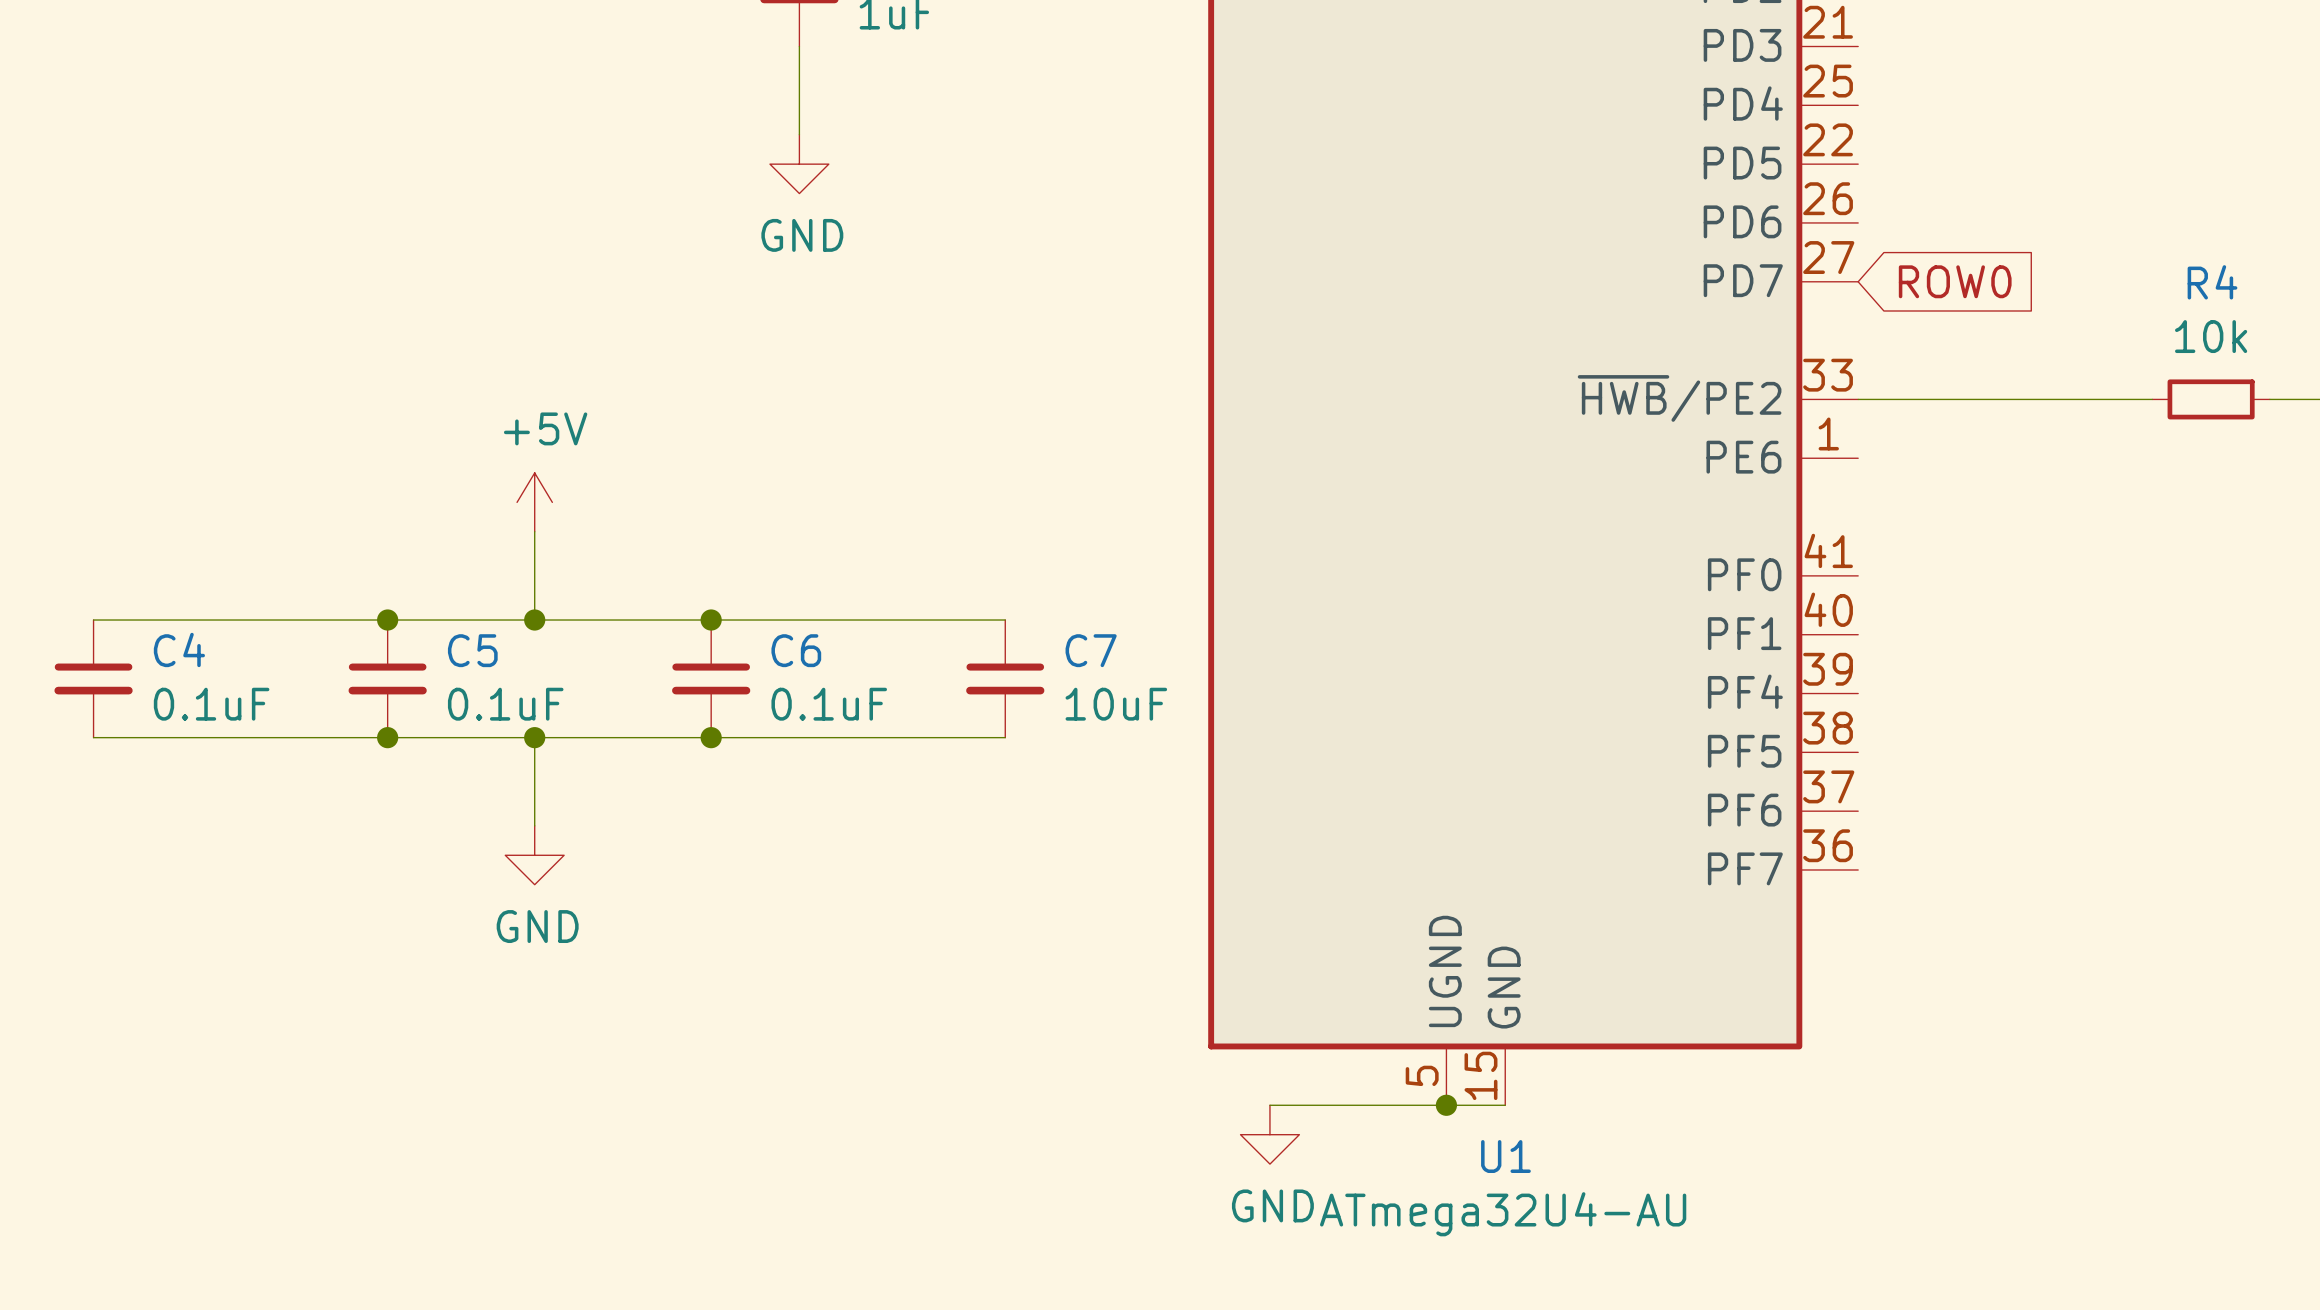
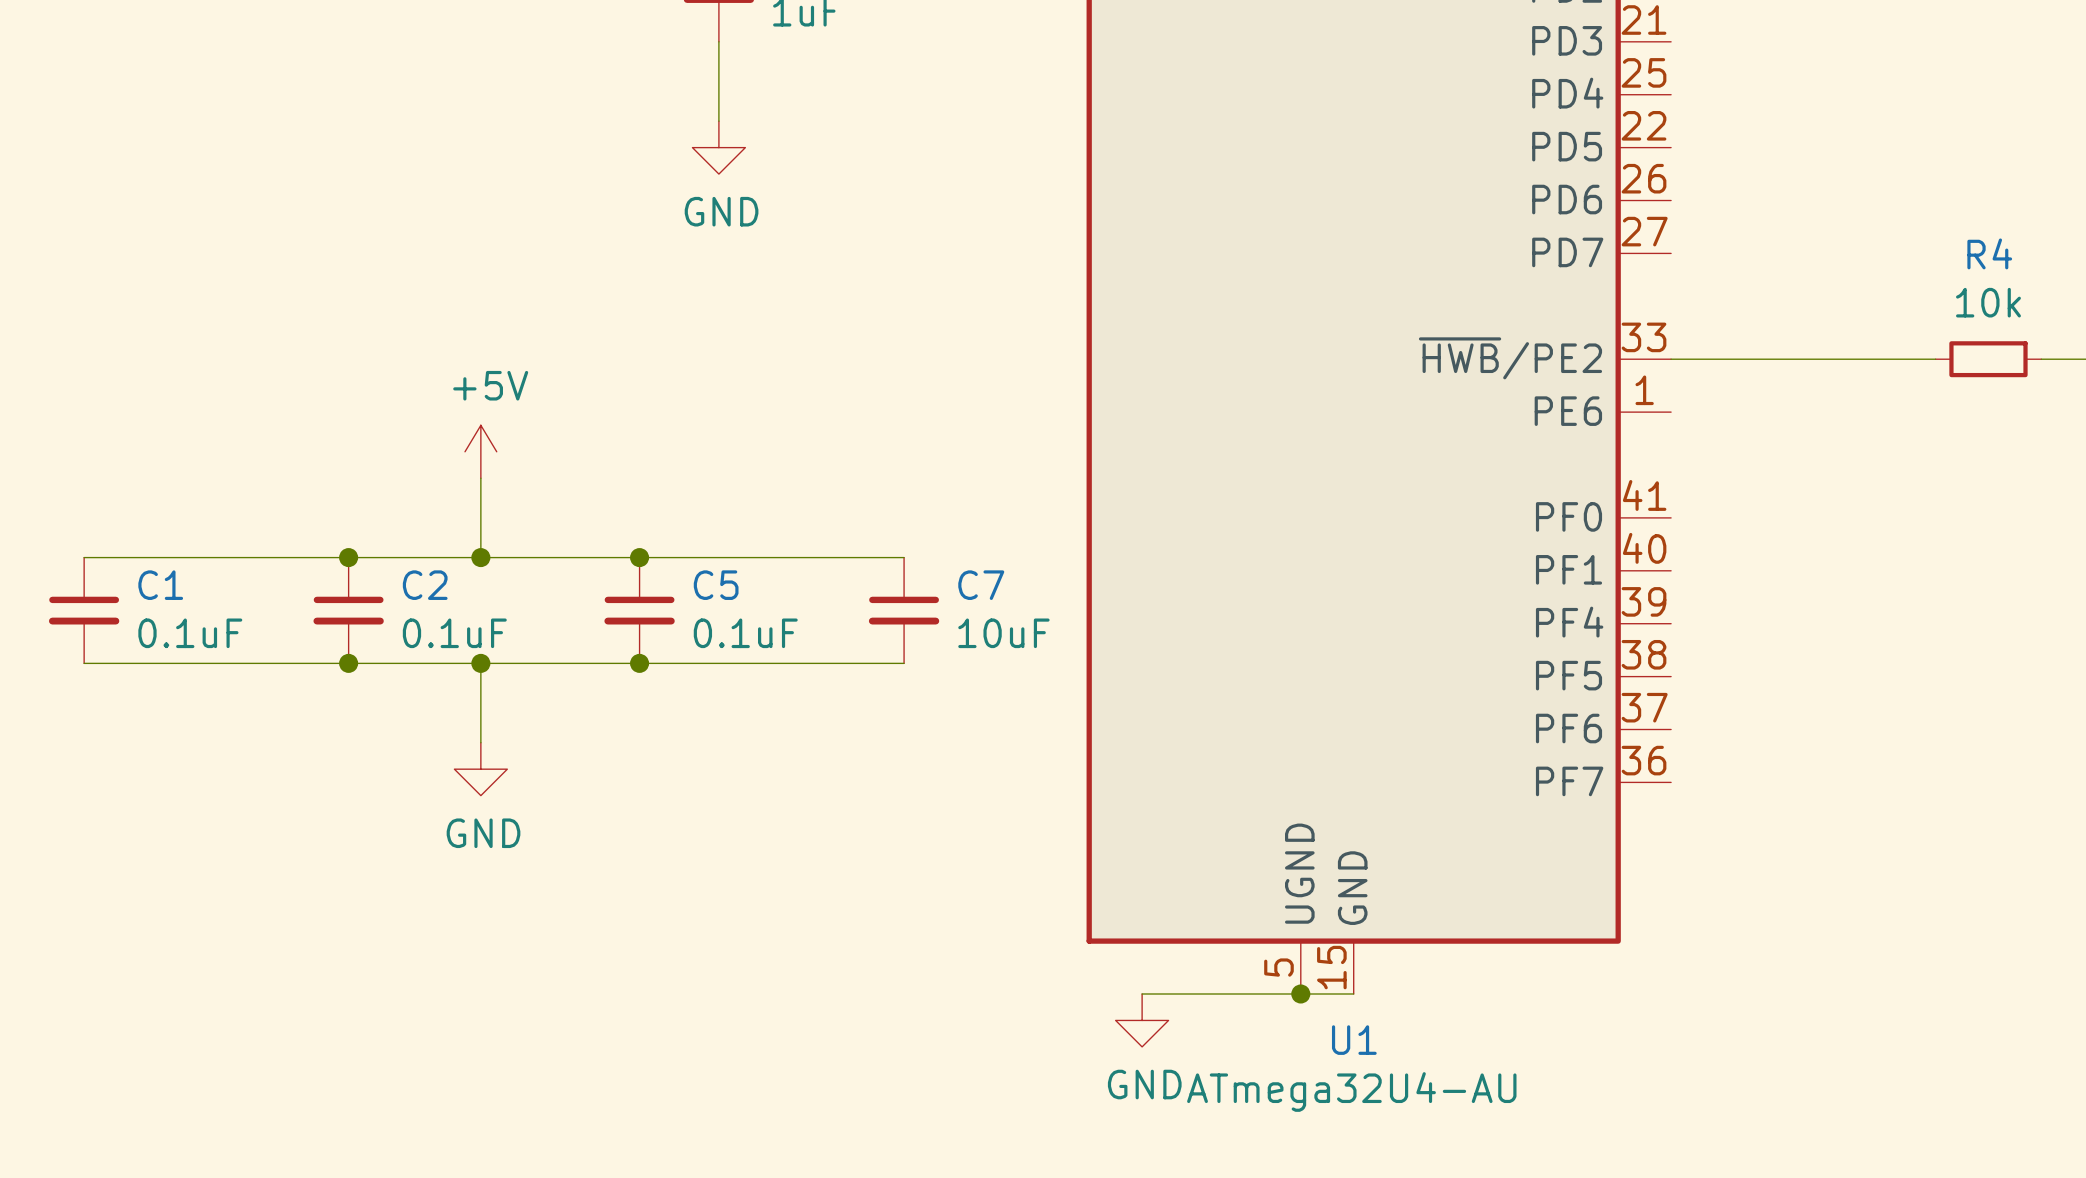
global label: ROW0 (1955, 281) -> none
C4 name: C4 (179, 649) -> C1 (160, 585)
C5 name: C5 (472, 650) -> C2 (425, 585)
C6 name: C6 (796, 650) -> C5 (716, 585)

